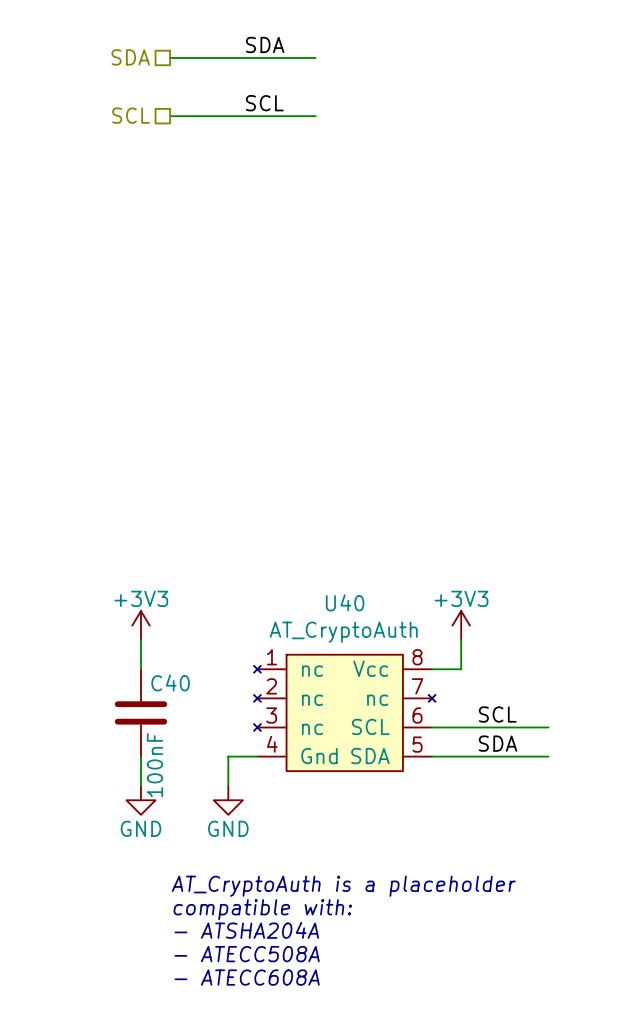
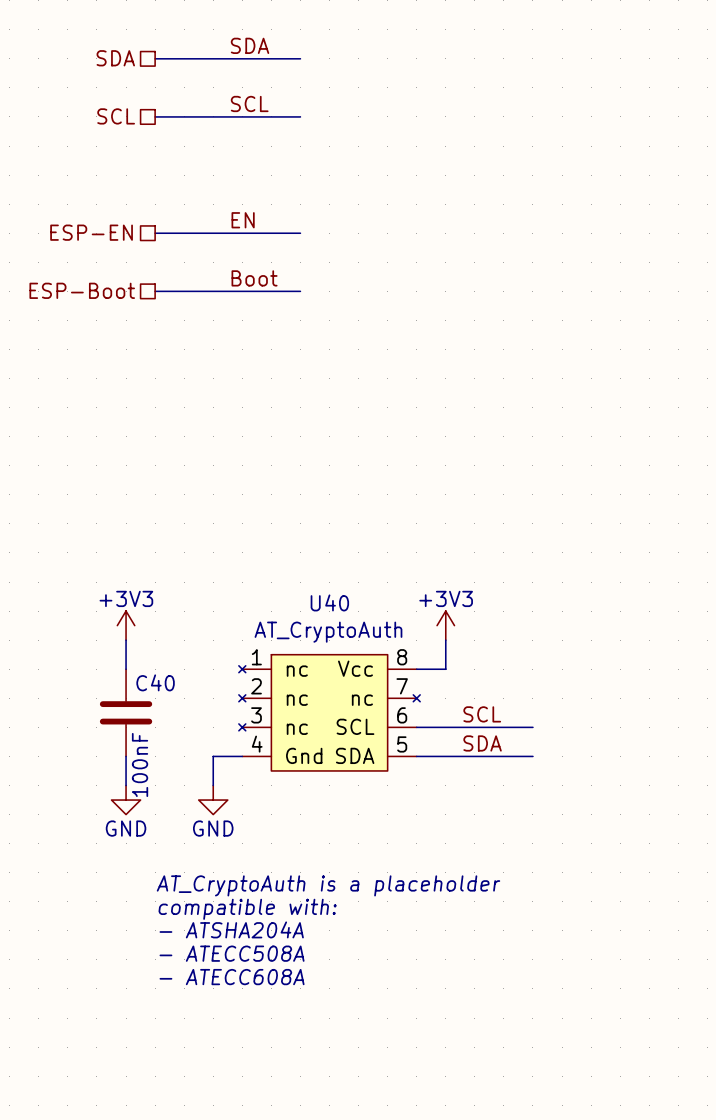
label: none -> EN (243, 220)
hierarchical label: none -> ESP-EN (91, 232)
wire: none -> (155, 233) (300, 233)
label: none -> Boot (254, 278)
hierarchical label: none -> ESP-Boot (82, 290)
wire: none -> (155, 291) (300, 291)

